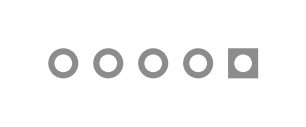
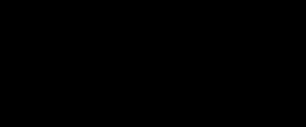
part: (153, 63) -> none

